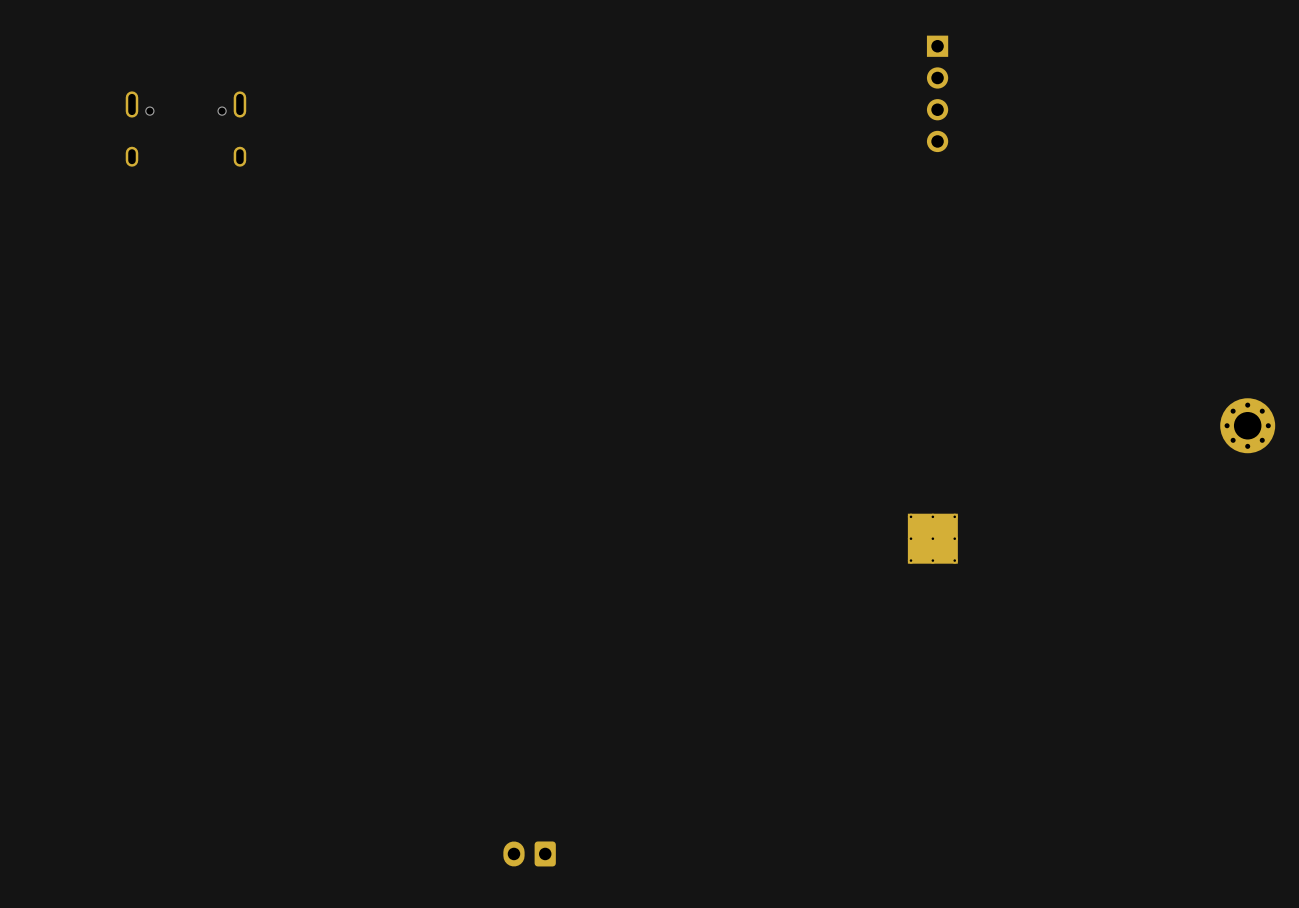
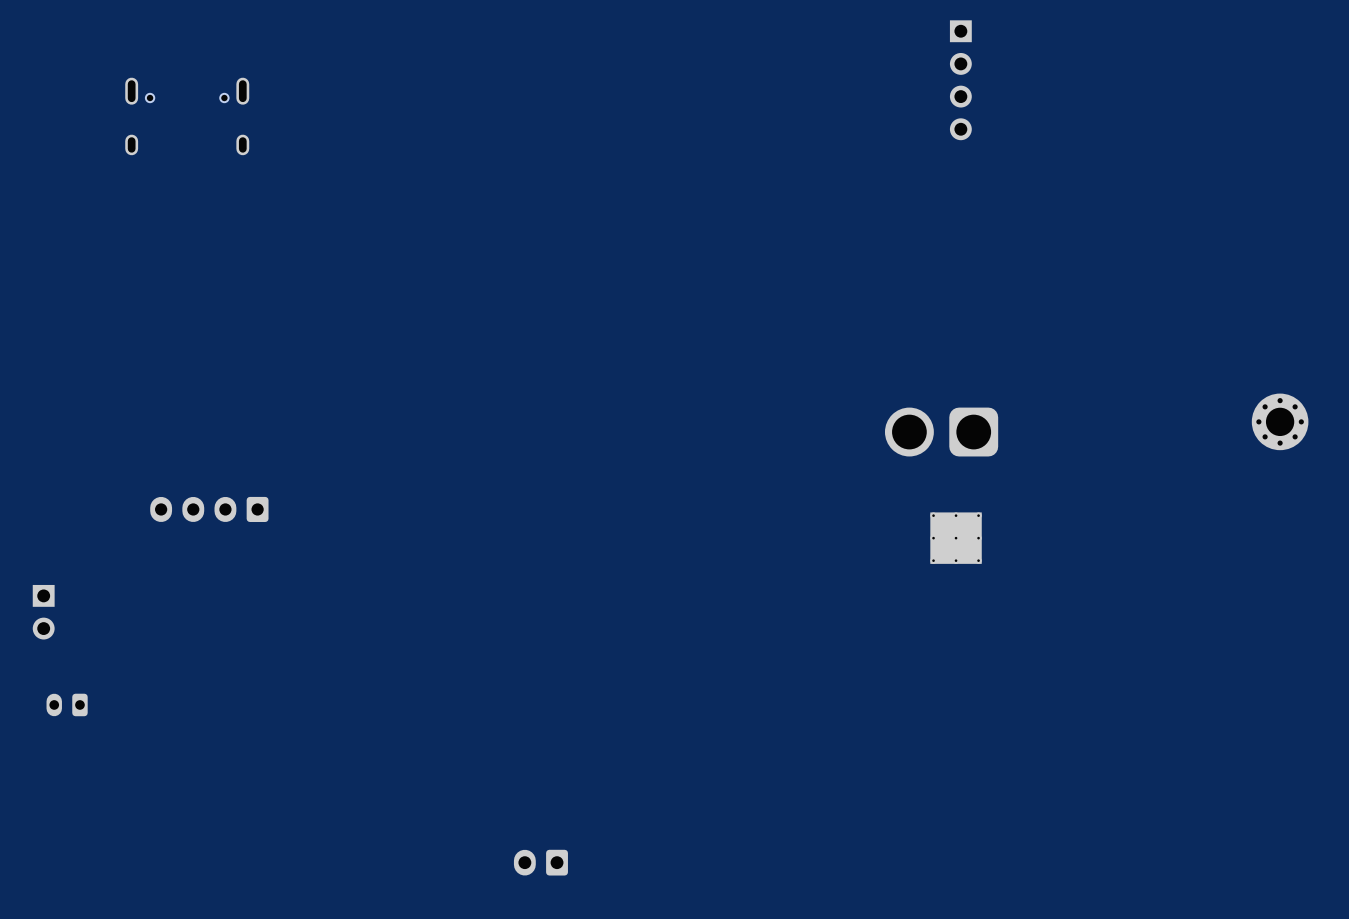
part: none -> (941, 432)
part: none -> (209, 509)
part: none -> (43, 612)
part: none -> (67, 704)

